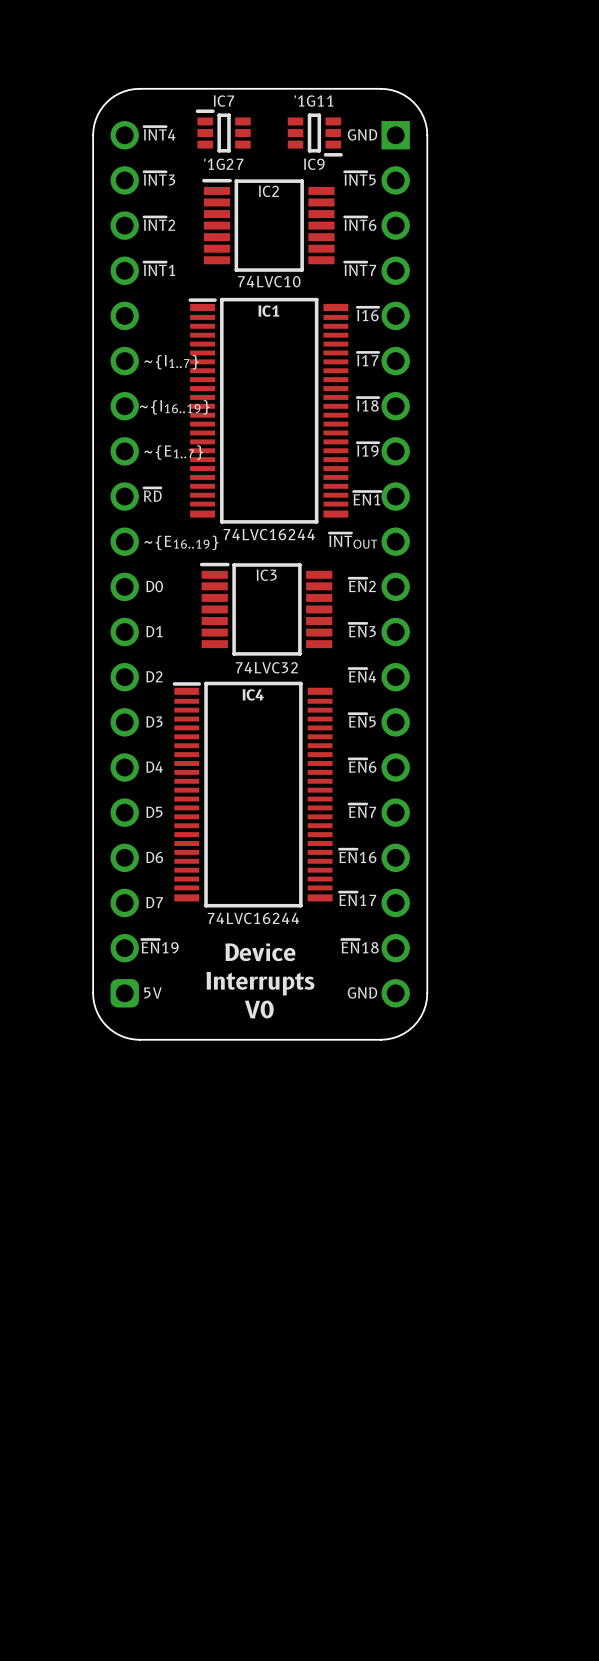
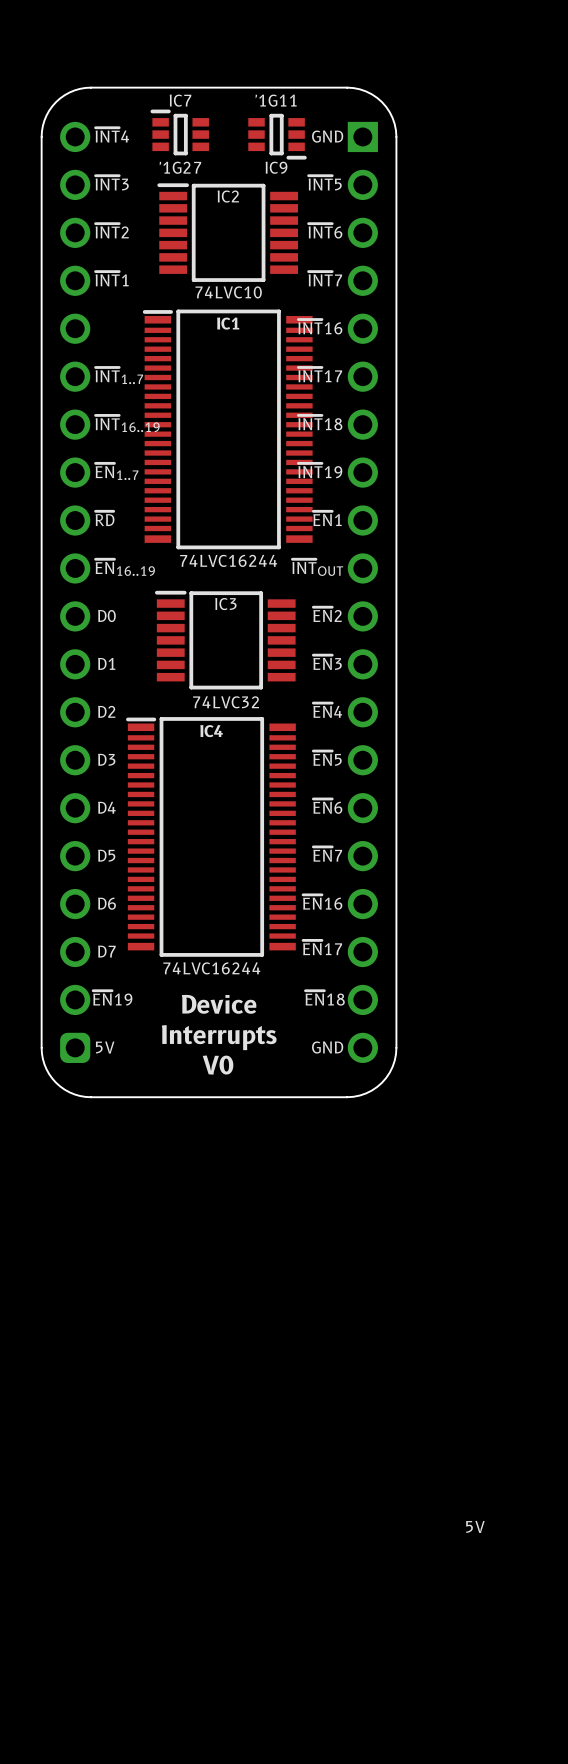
text: ~{I16} (368, 314) -> ~{INT}16 (320, 326)
text: ~{I17} (368, 359) -> ~{INT}17 (320, 374)
text: ~{I1..7} (171, 362) -> ~{INT}1..7 (119, 375)
text: ~{I18} (368, 404) -> ~{INT}18 (320, 422)
text: ~{I16..19} (174, 407) -> ~{INT}16..19 (127, 423)
text: ~{I19} (368, 449) -> ~{INT}19 (320, 470)
text: ~{E1..7} (173, 452) -> ~{EN}1..7 (116, 471)
text: ~{EN1} (367, 498) -> ~{EN}1 (327, 518)
text: ~{E16..19} (181, 542) -> ~{EN}16..19 (125, 567)
text: none -> 5V (475, 1526)

